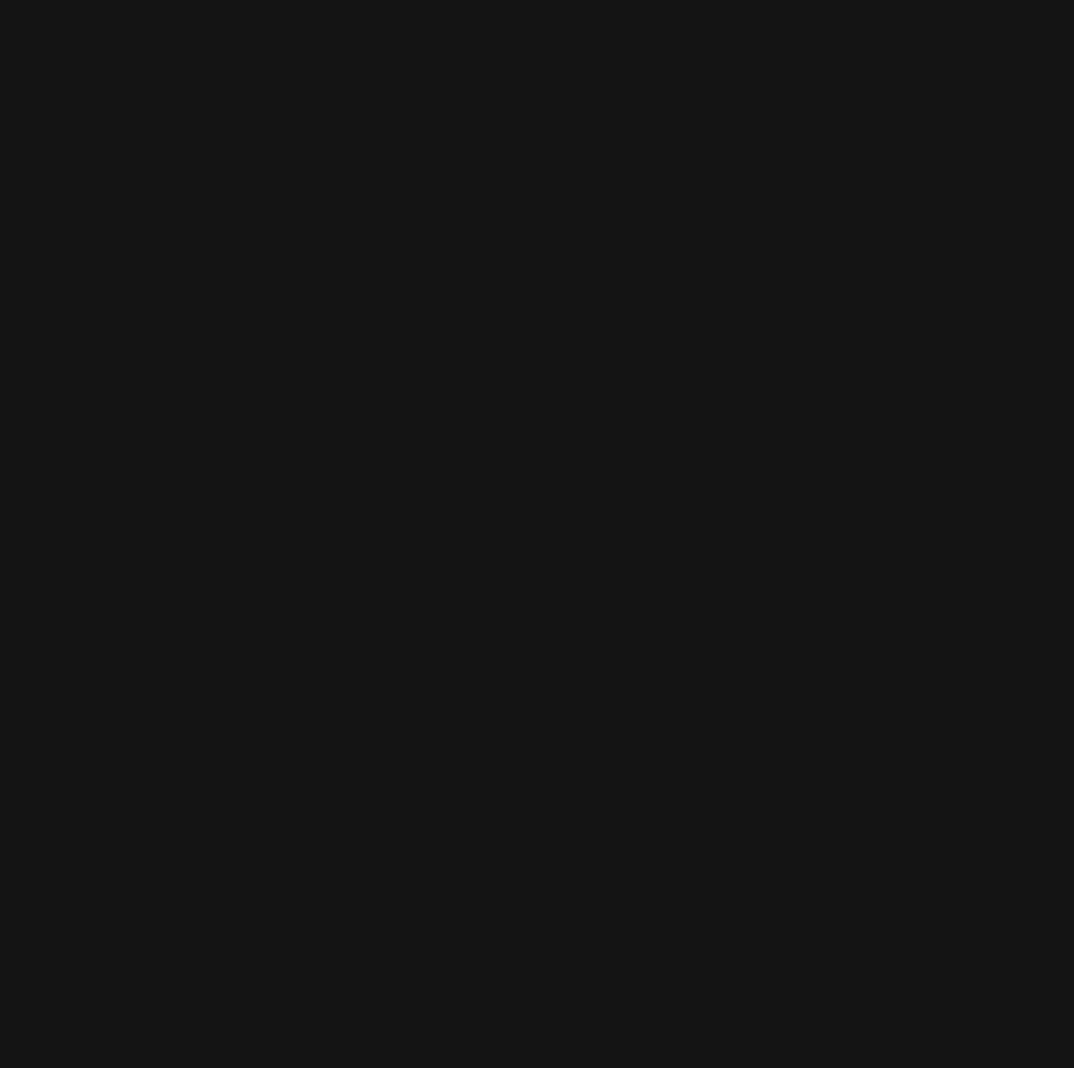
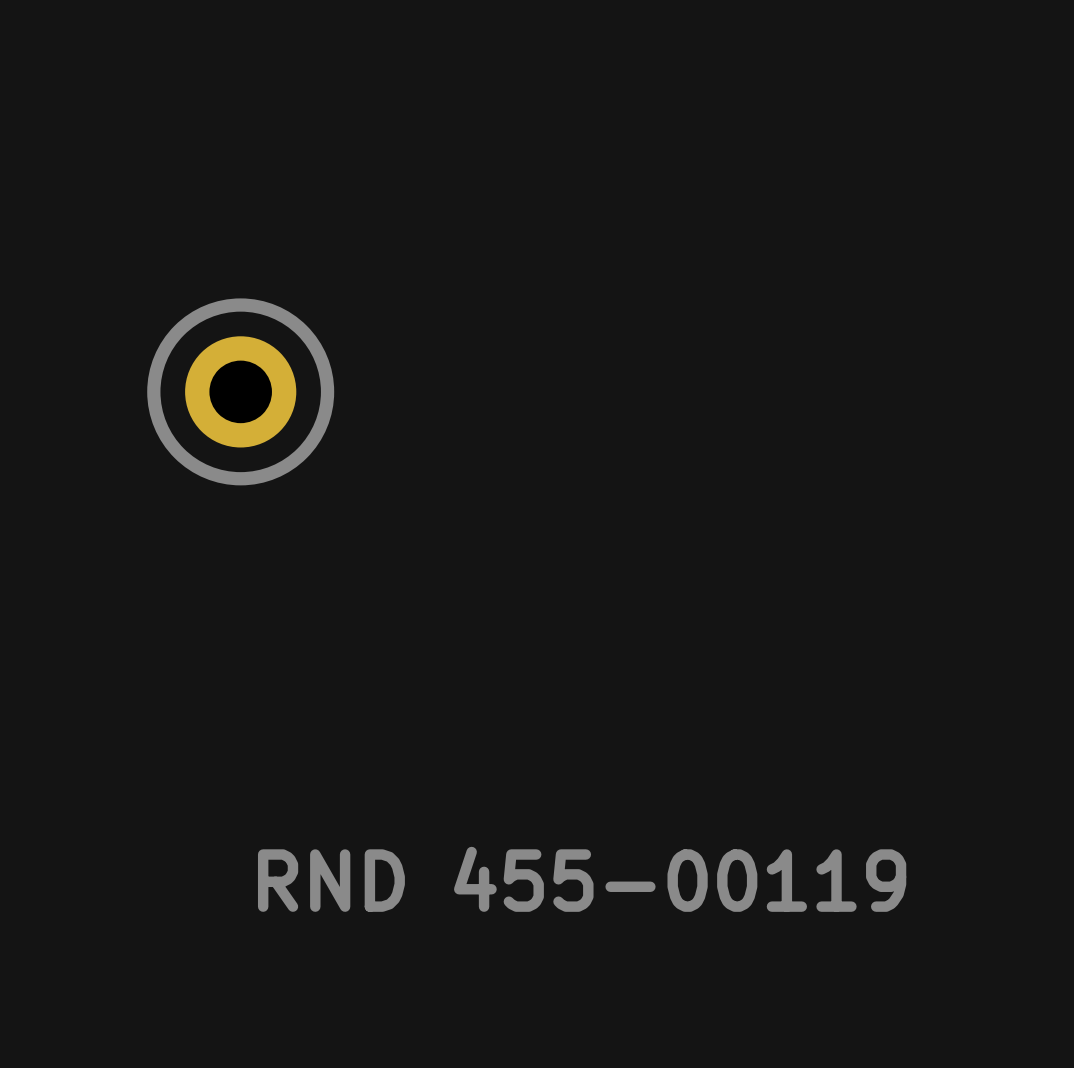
part: none -> (240, 391)
text: none -> RND 455-00119 (582, 879)

